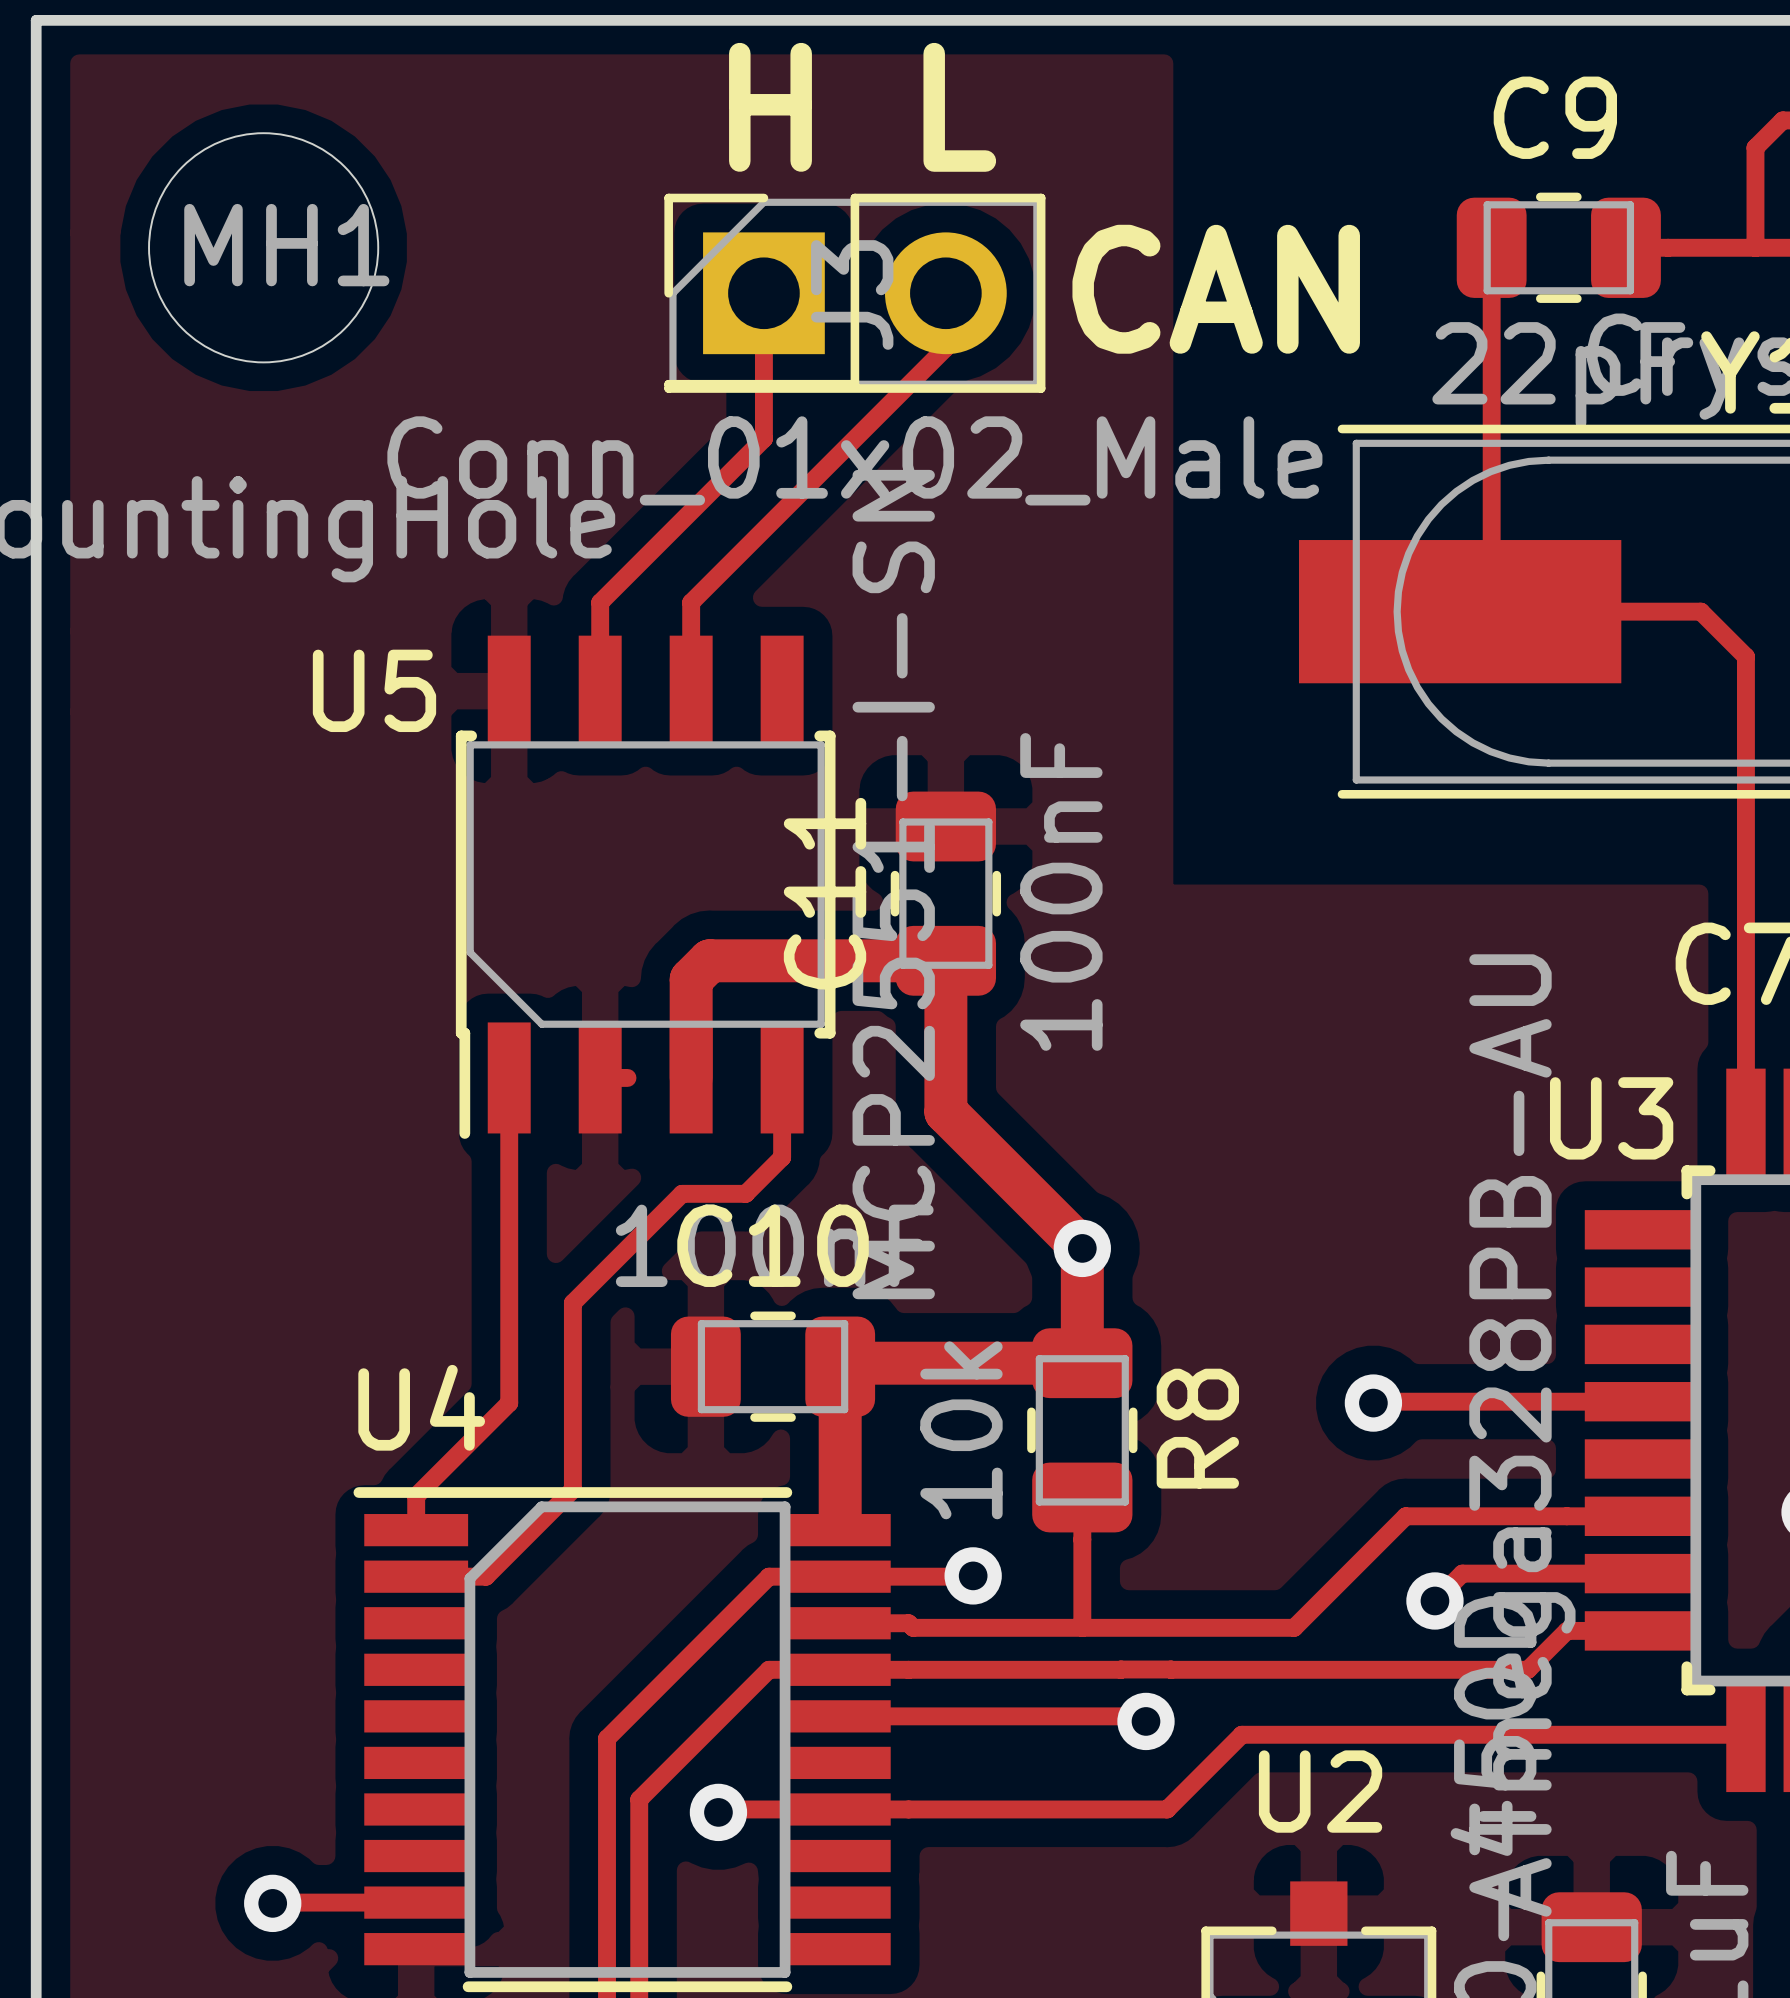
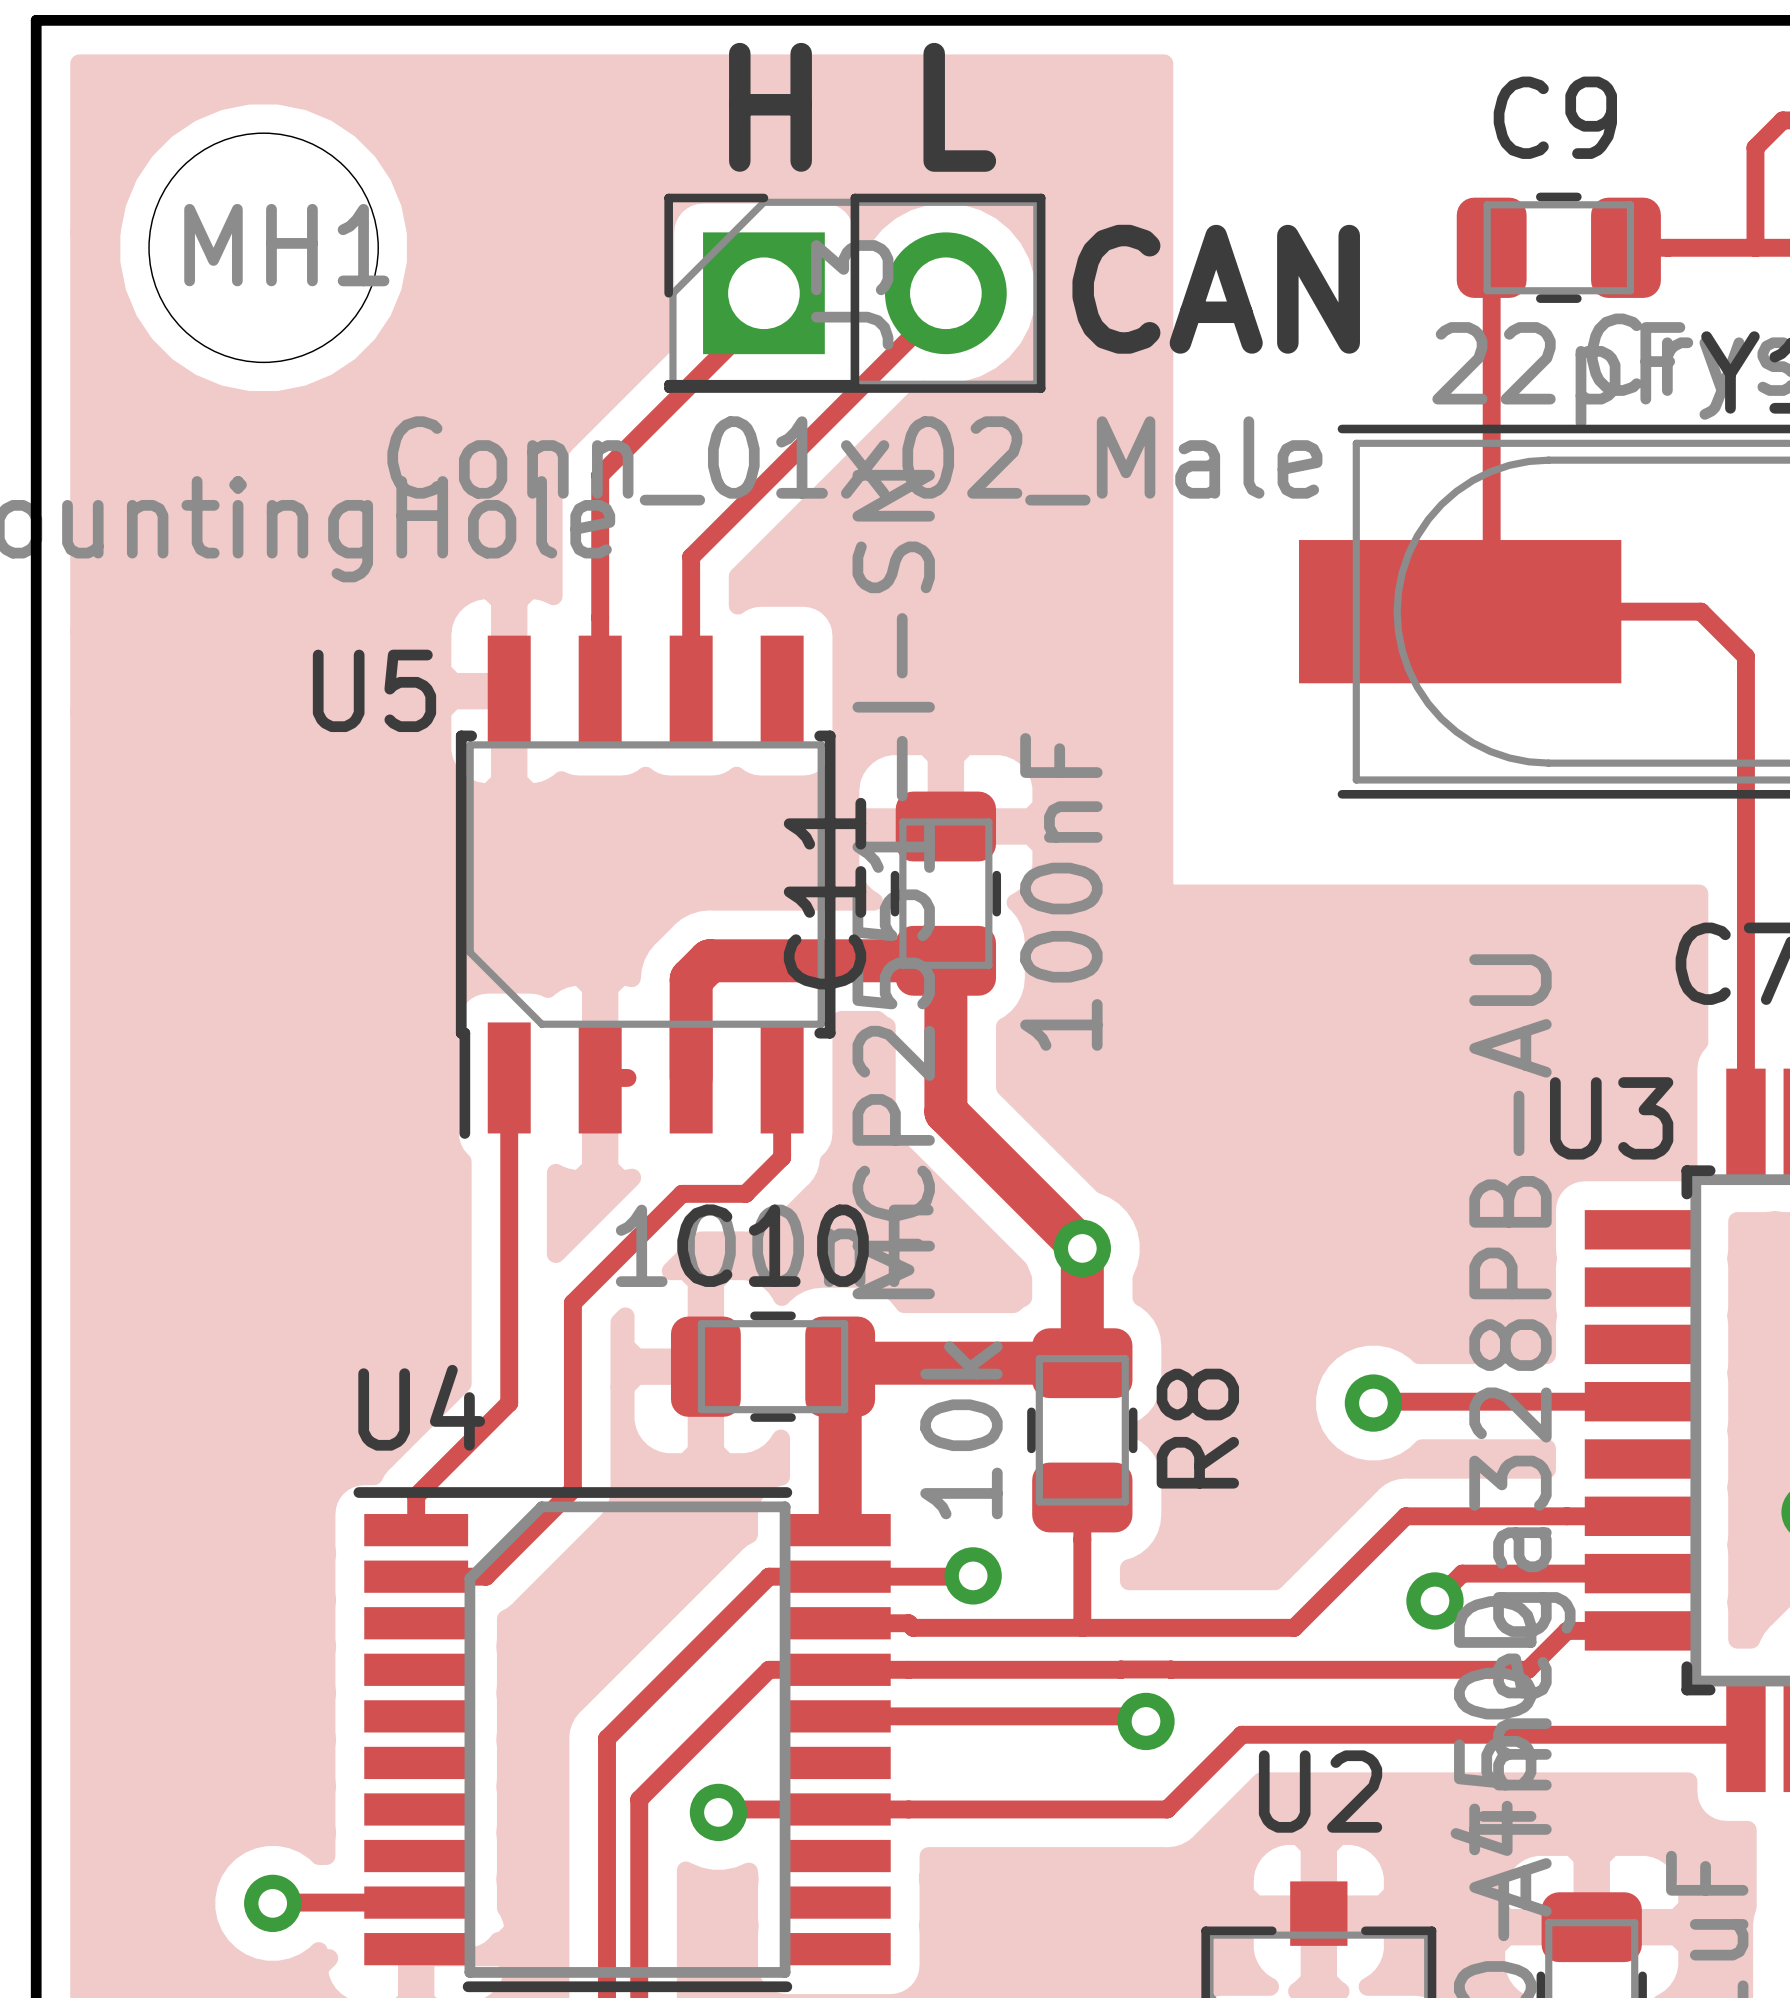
track: (763, 293) (763, 438) (600, 602) -> (763, 311) (600, 475) (600, 602)
track: (945, 293) (945, 347) (691, 602) -> (945, 302) (691, 557) (691, 602)

